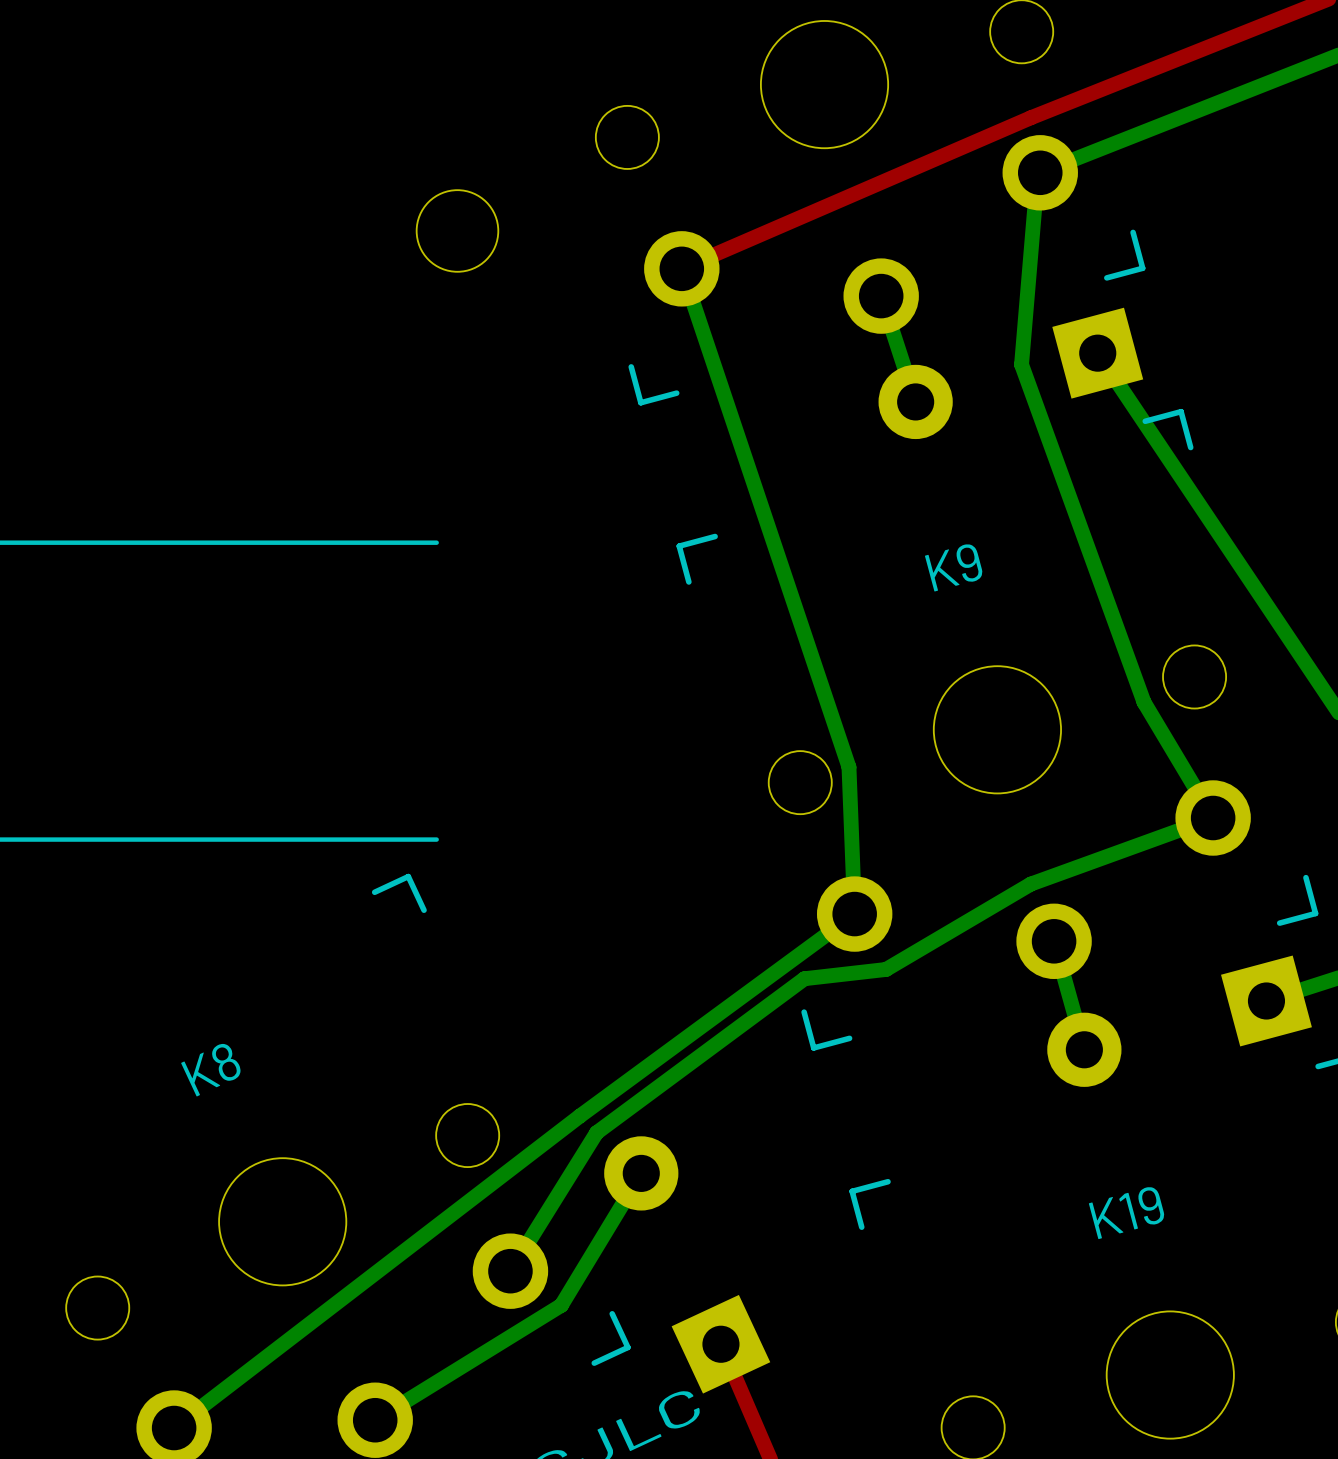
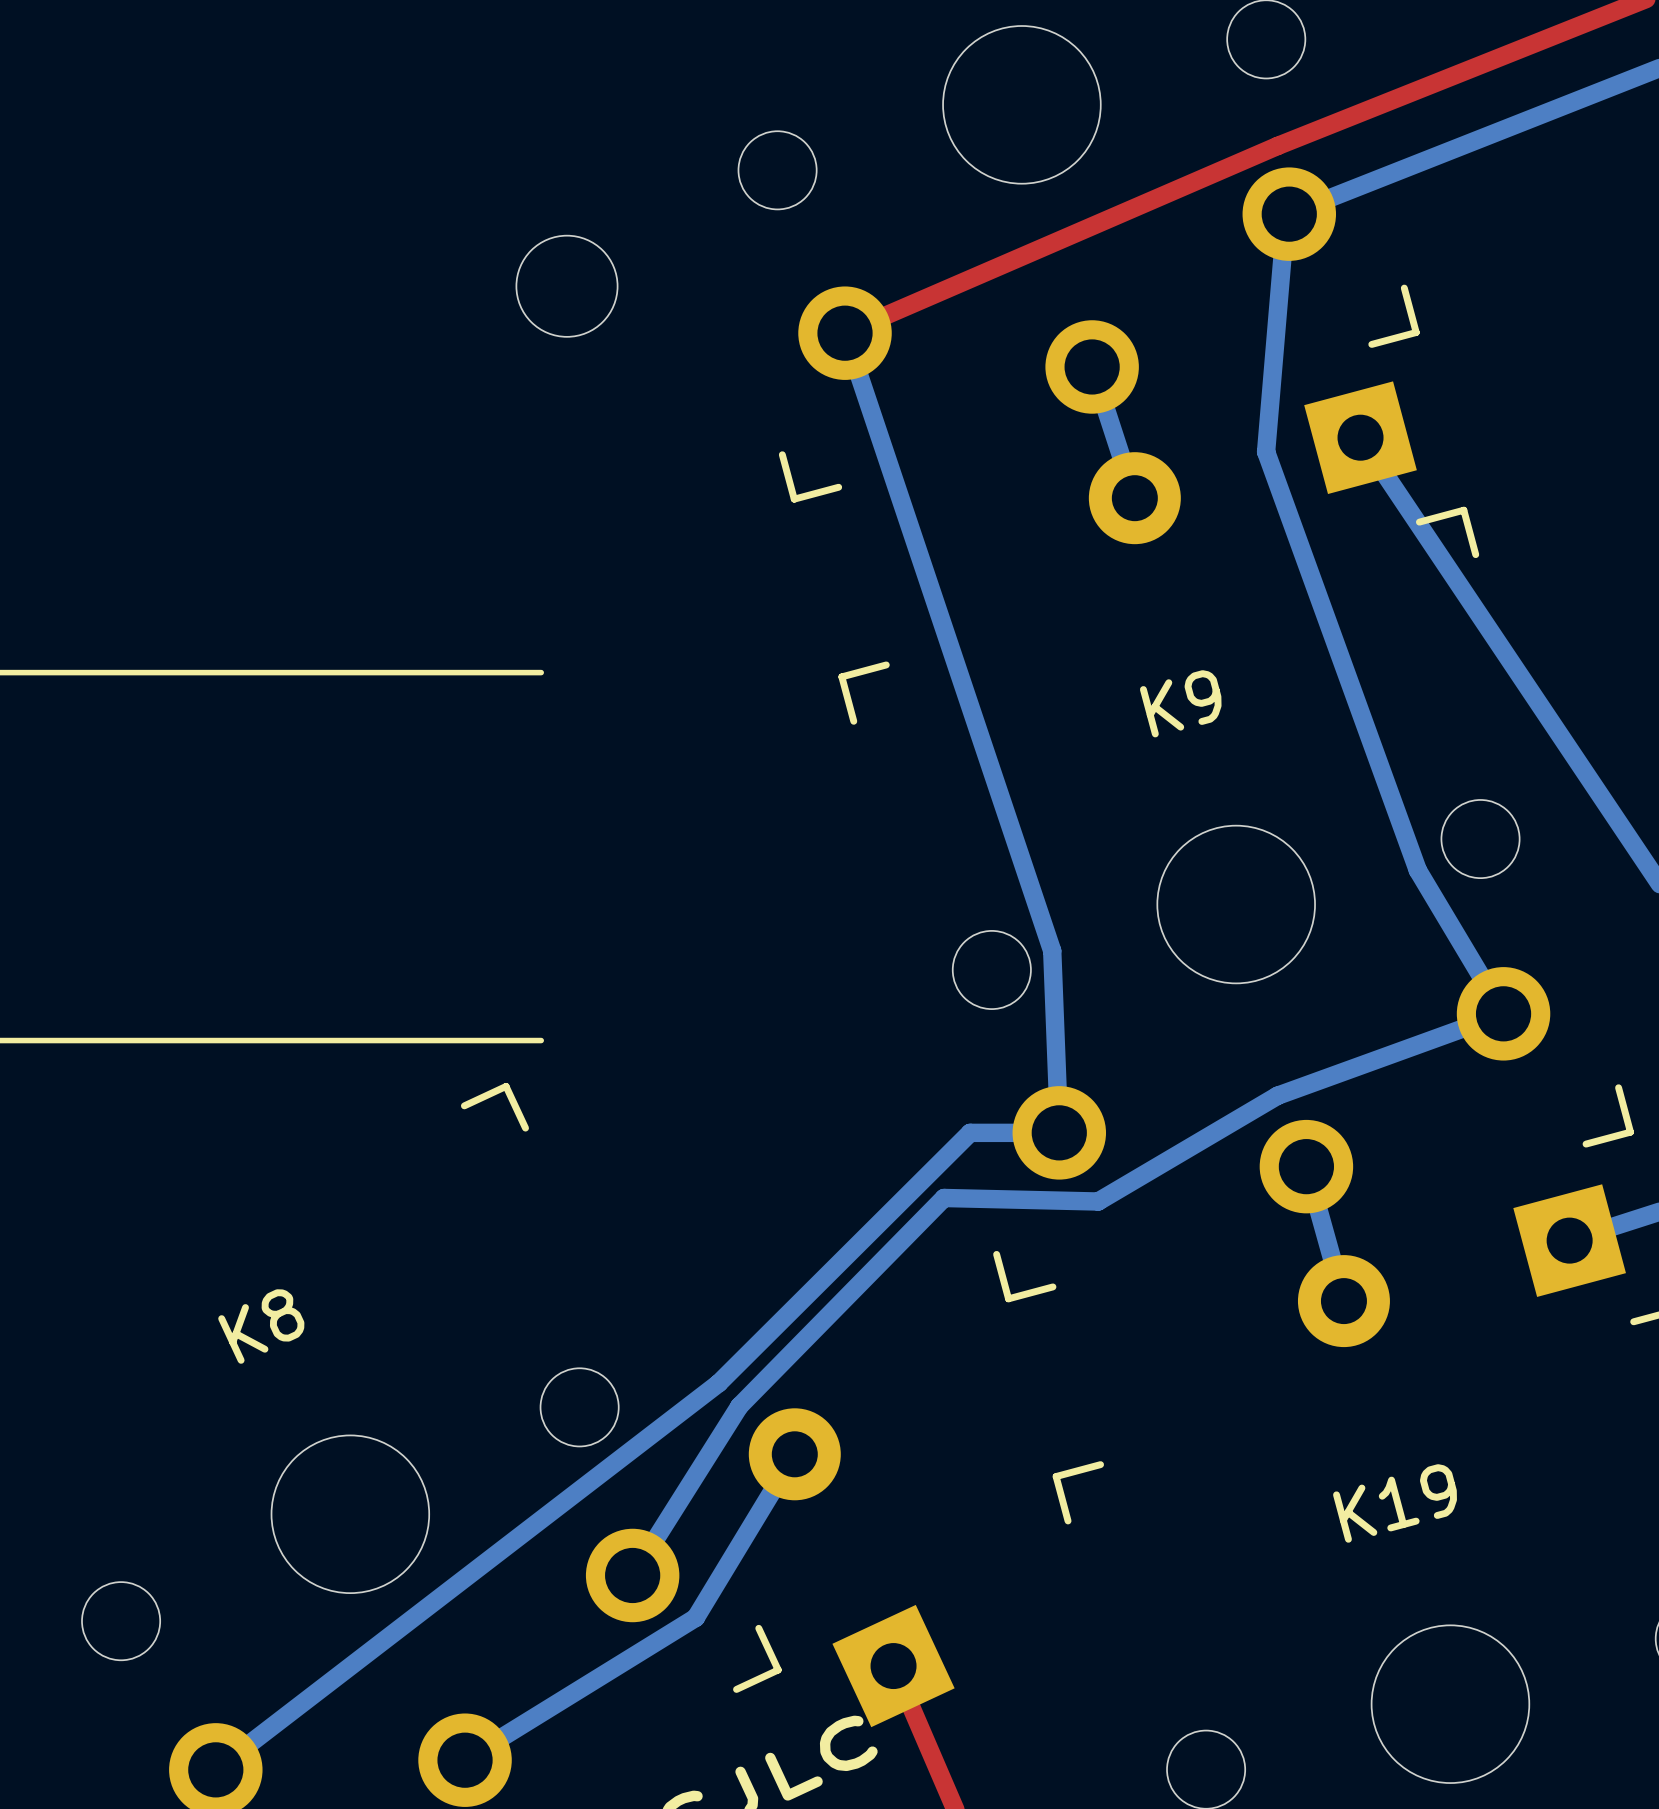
bottom track: (854, 914) (579, 1116) -> (1059, 1132) (970, 1132) (718, 1383)
bottom track: (886, 969) (804, 978) (596, 1132) (510, 1271) -> (1098, 1201) (944, 1197) (739, 1406) (632, 1575)

